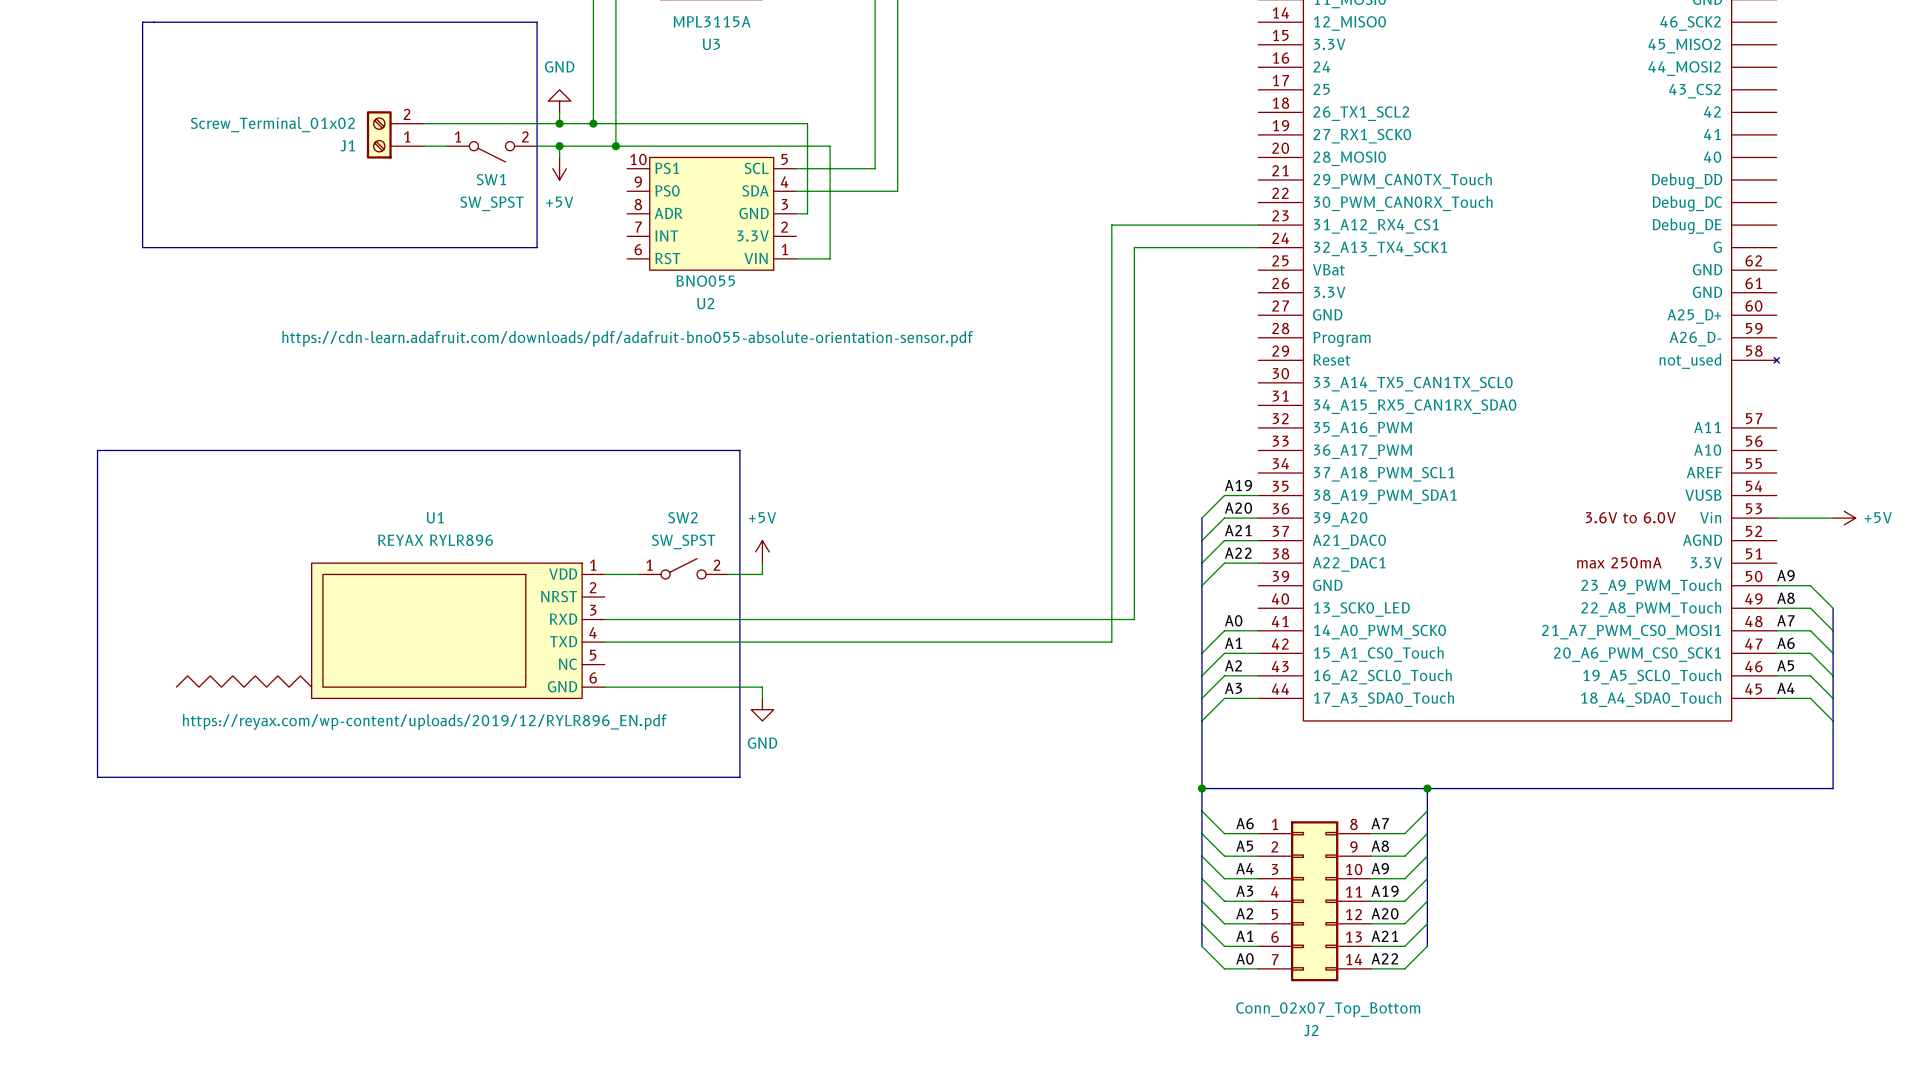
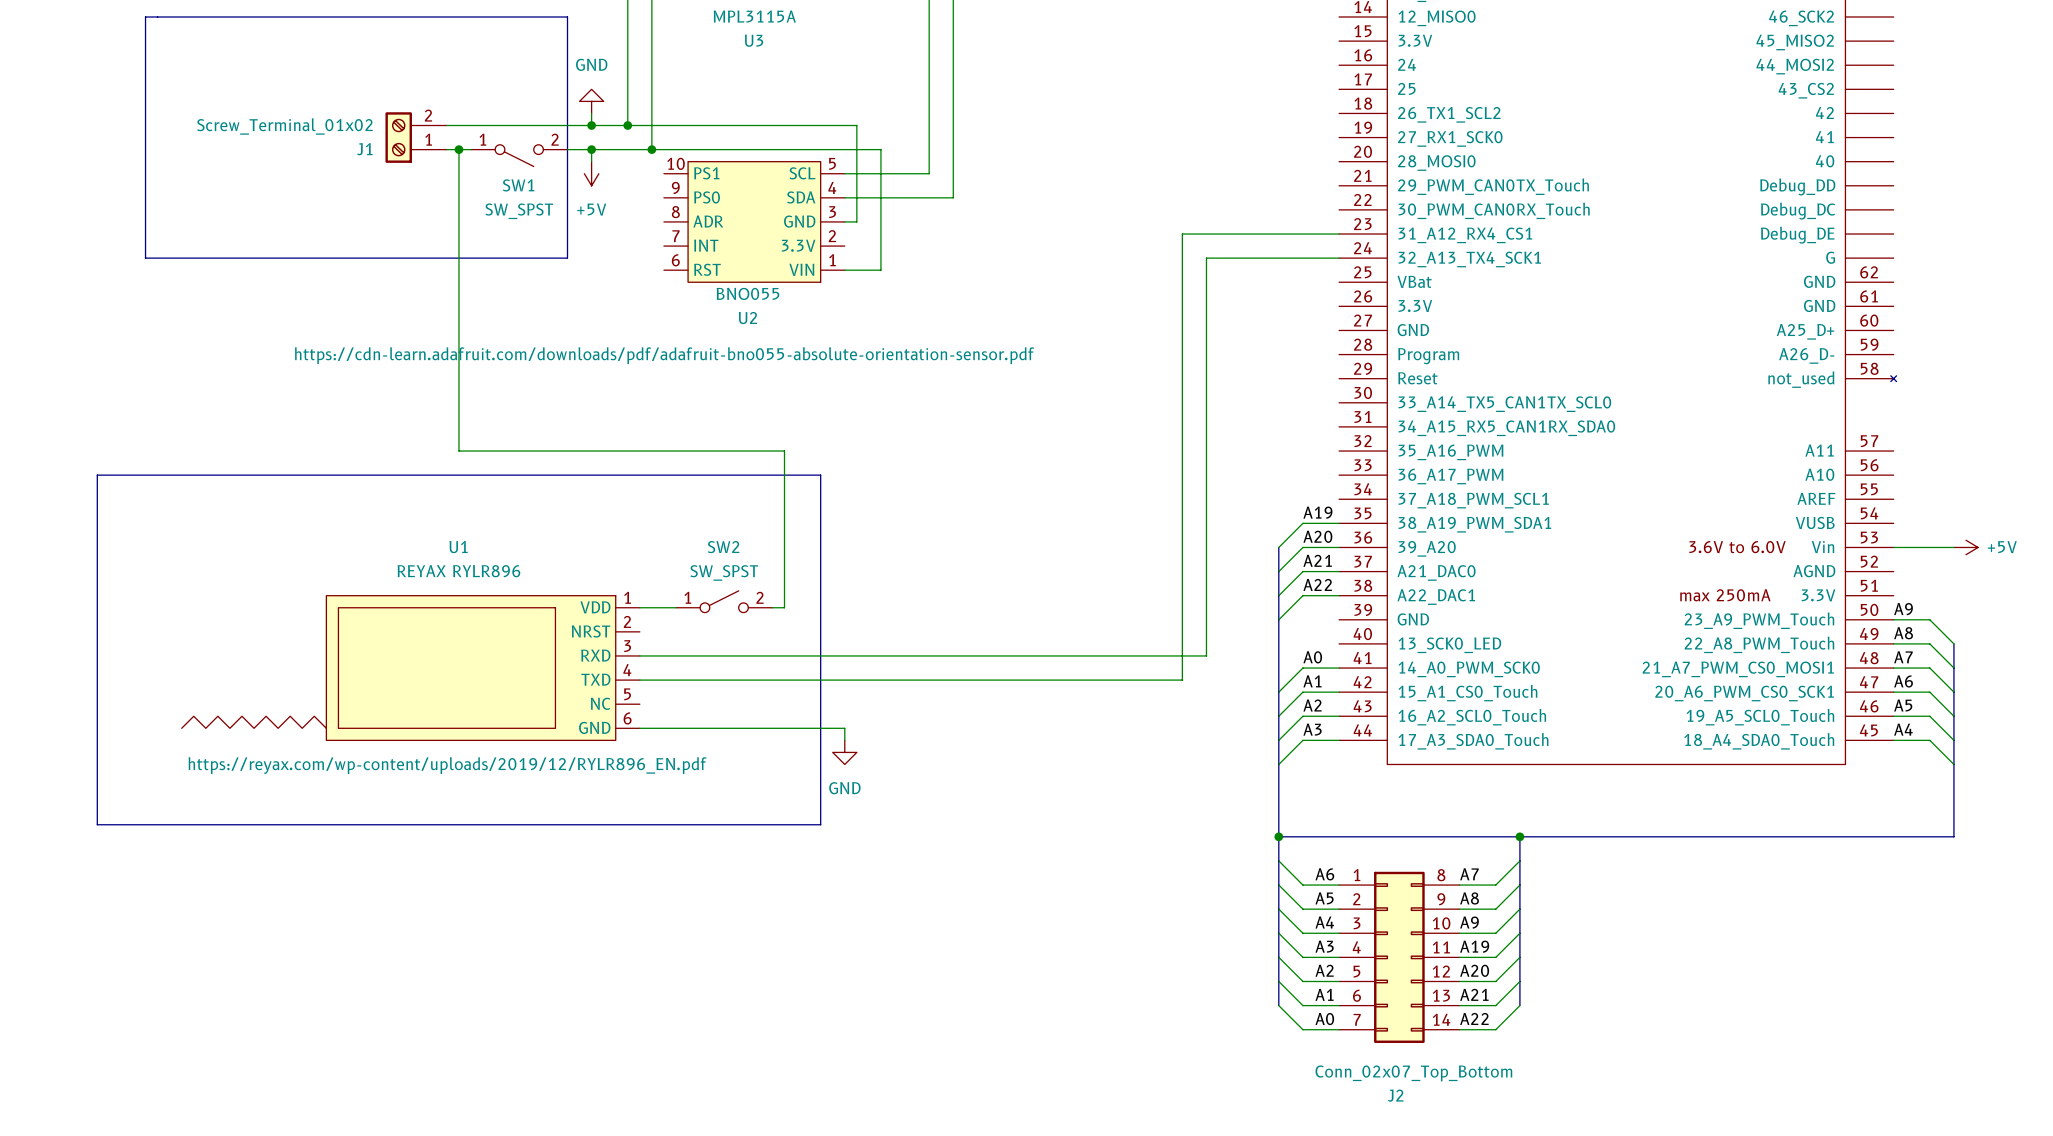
junction: none -> (458, 149)
line: (739, 450) (739, 777) -> (784, 475) (820, 475) (820, 824) (784, 824)
power symbol: +5V (762, 551) -> none
wire: (762, 563) (762, 574) (739, 574) -> (458, 149) (458, 451) (784, 451) (784, 607)
wire: (762, 687) (762, 698) -> (808, 728) (844, 728) (844, 740)
power symbol position: GND (762, 709) -> GND (844, 752)

